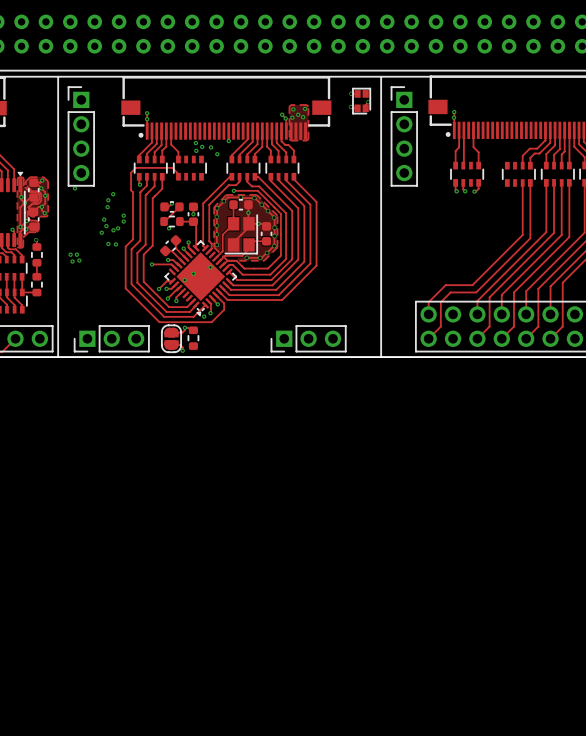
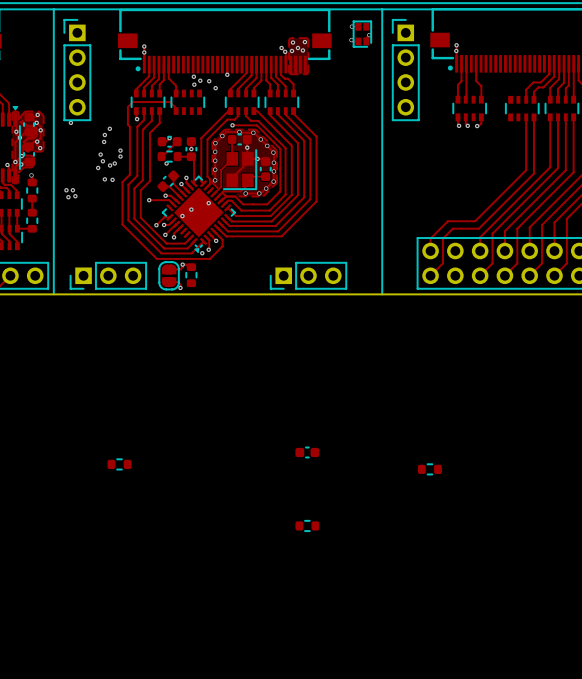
part: none -> (307, 452)
part: none -> (119, 464)
part: none -> (429, 469)
part: none -> (307, 525)

